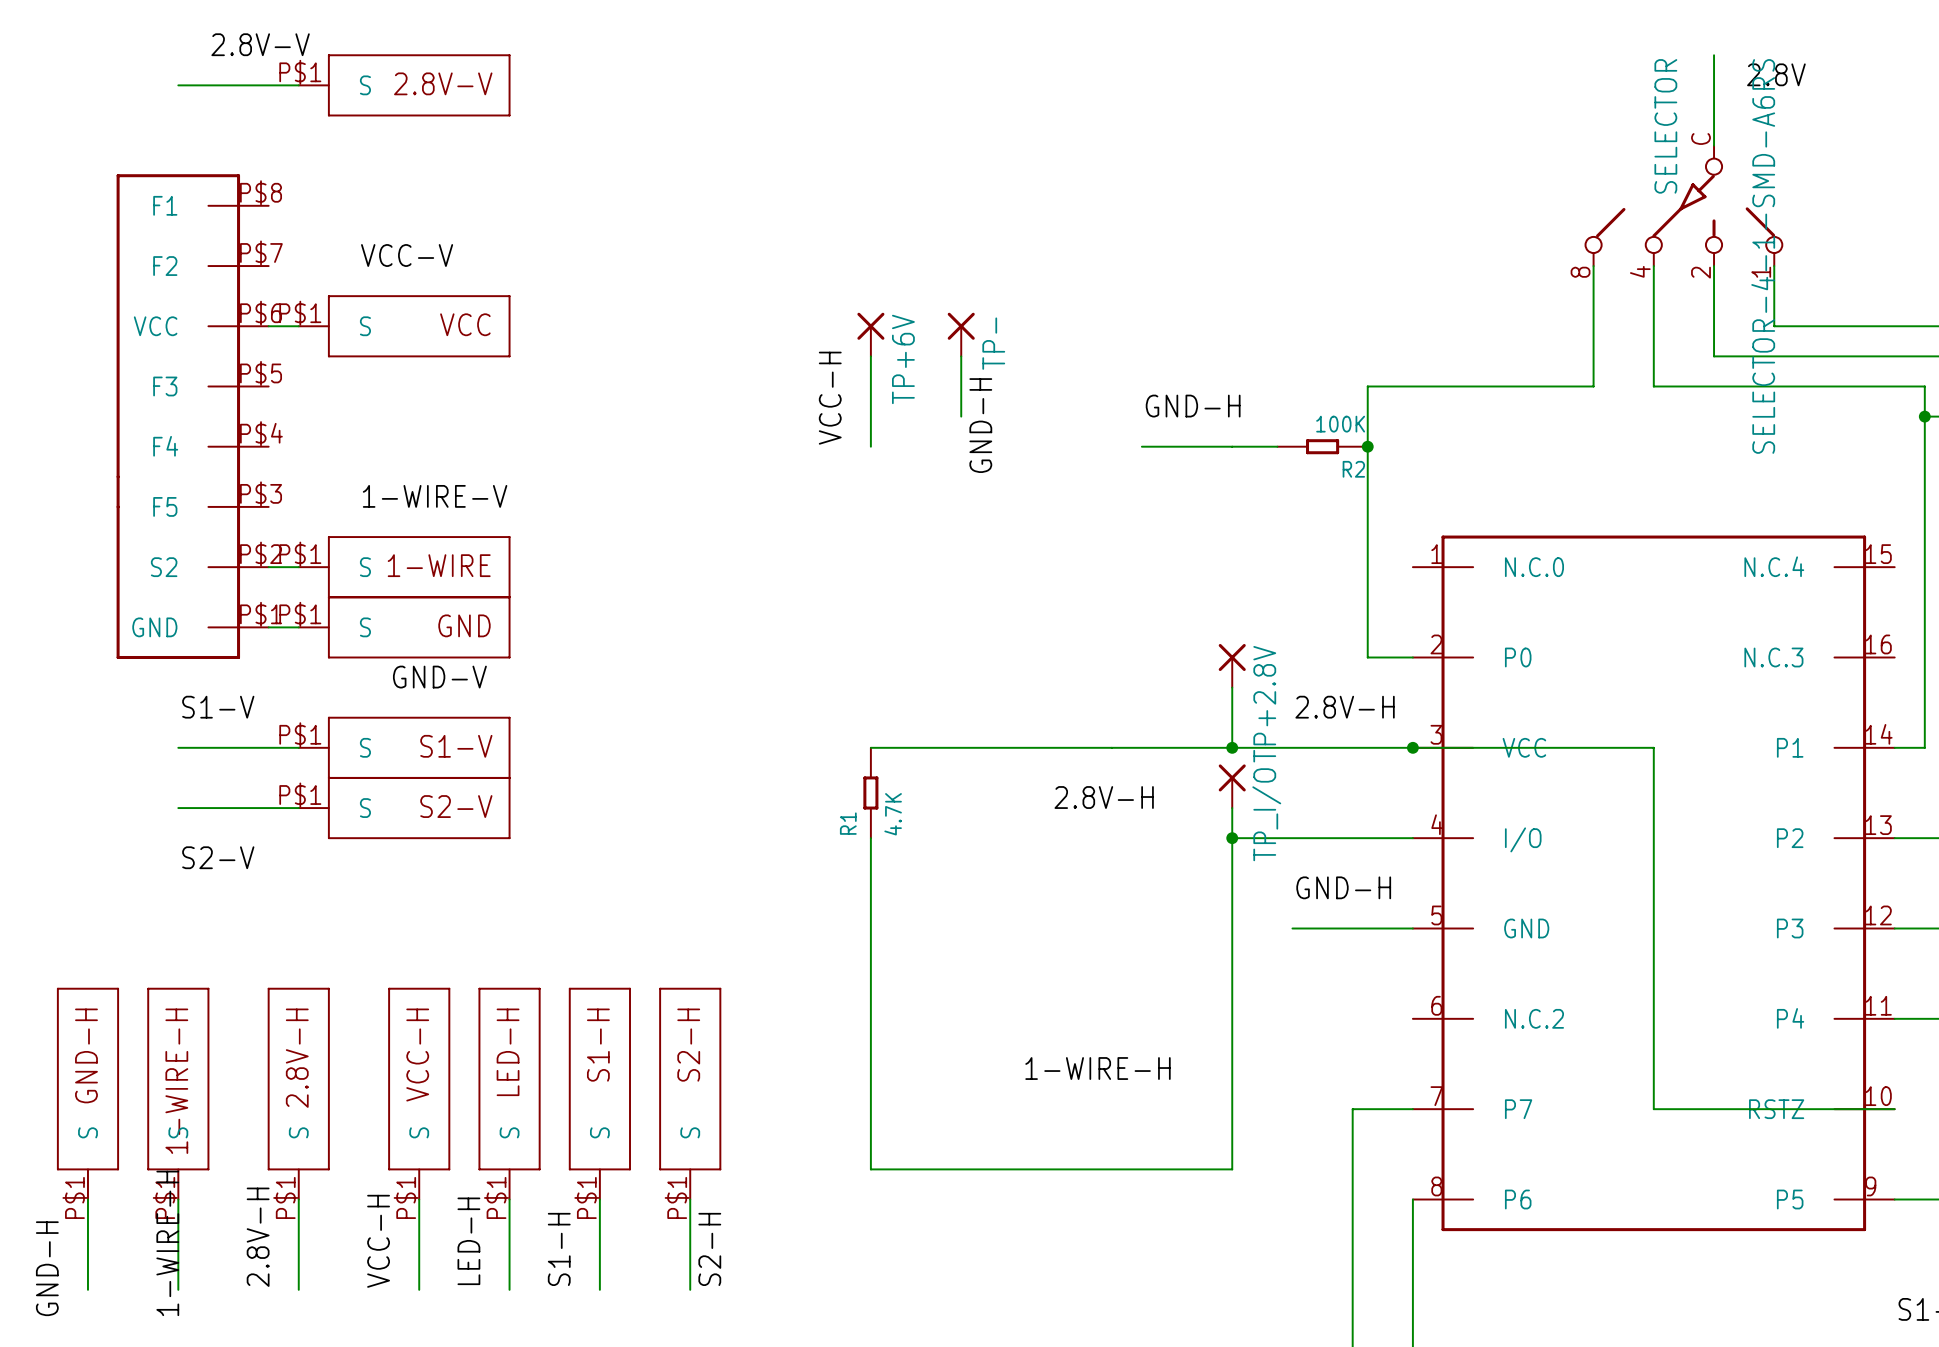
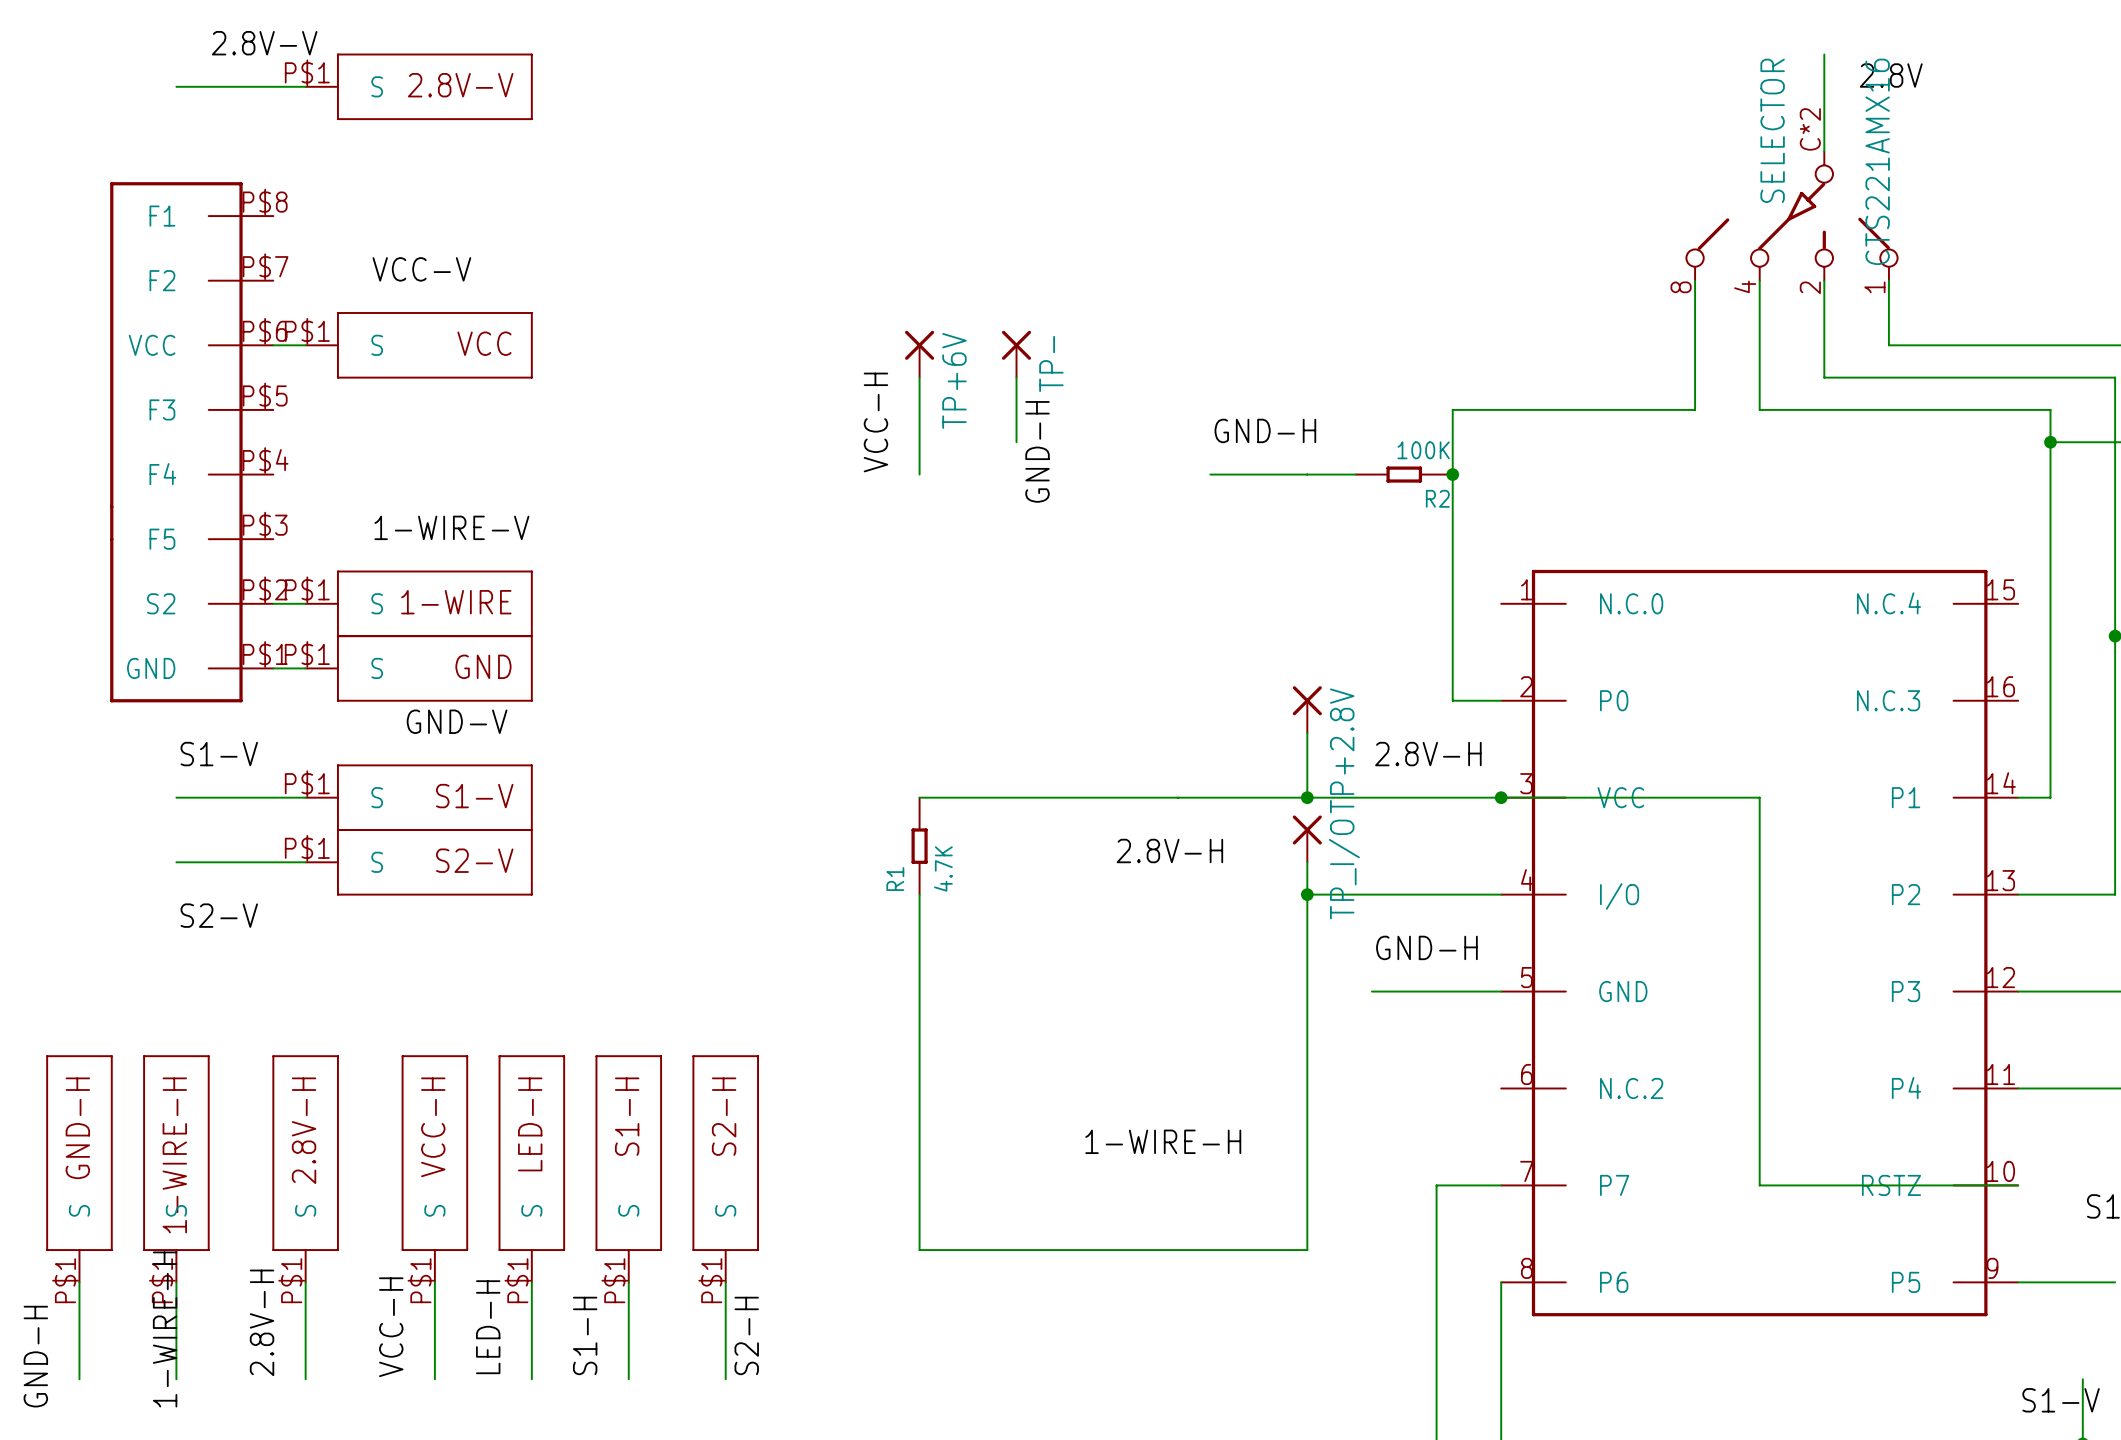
SELECTOR pin number: C (1700, 139) -> C*2 (1810, 129)
SELECTOR value: SELECTOR-4-1-SMD-A6RS (1763, 256) -> CTS221AMX16 (1877, 161)

